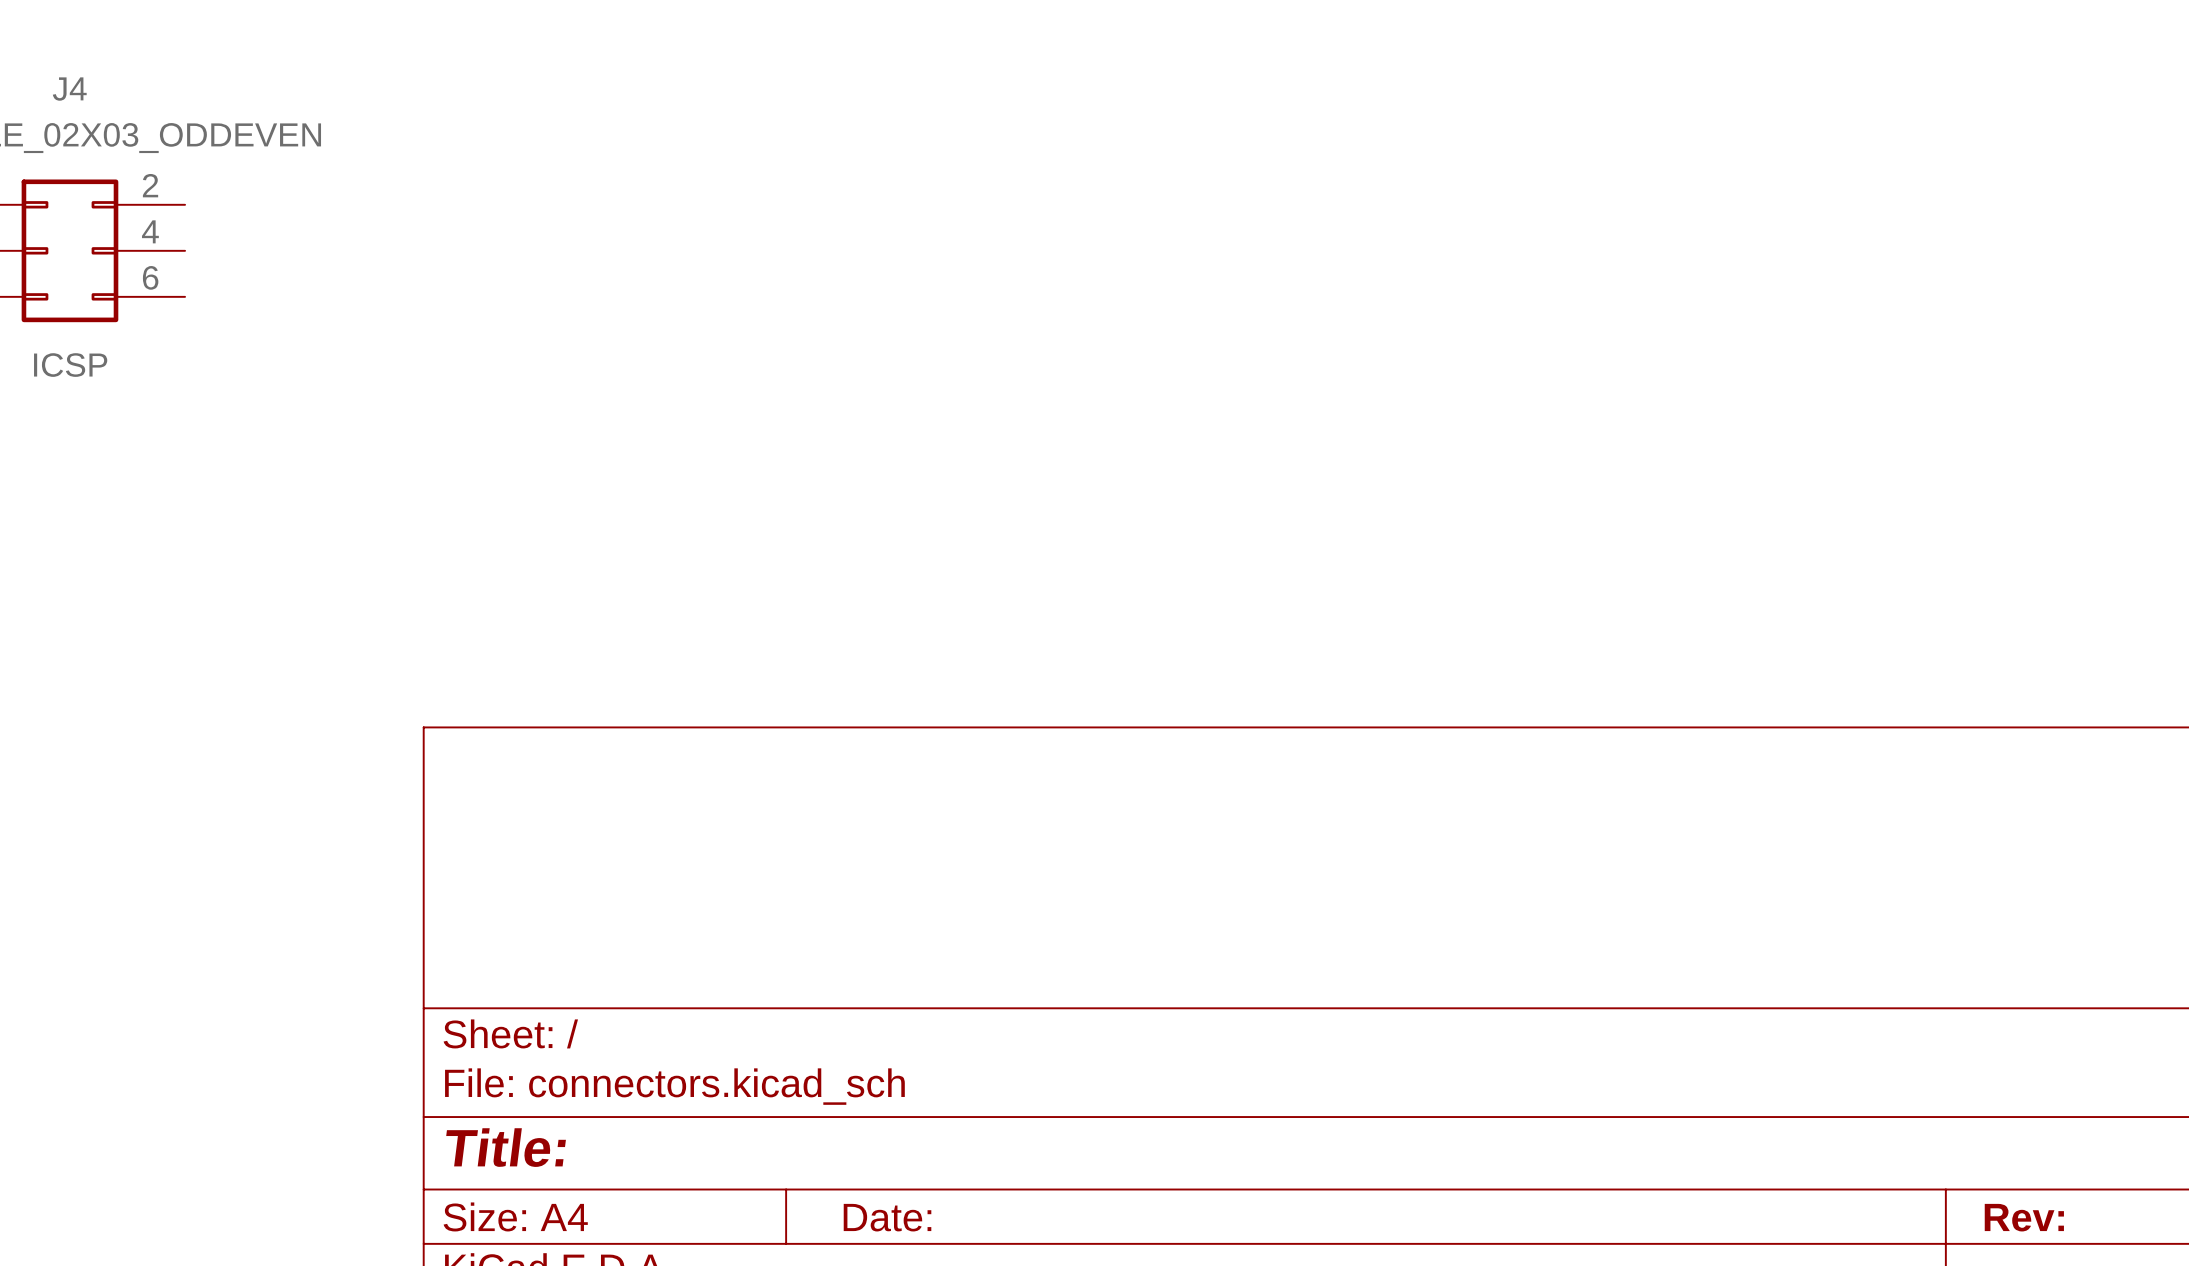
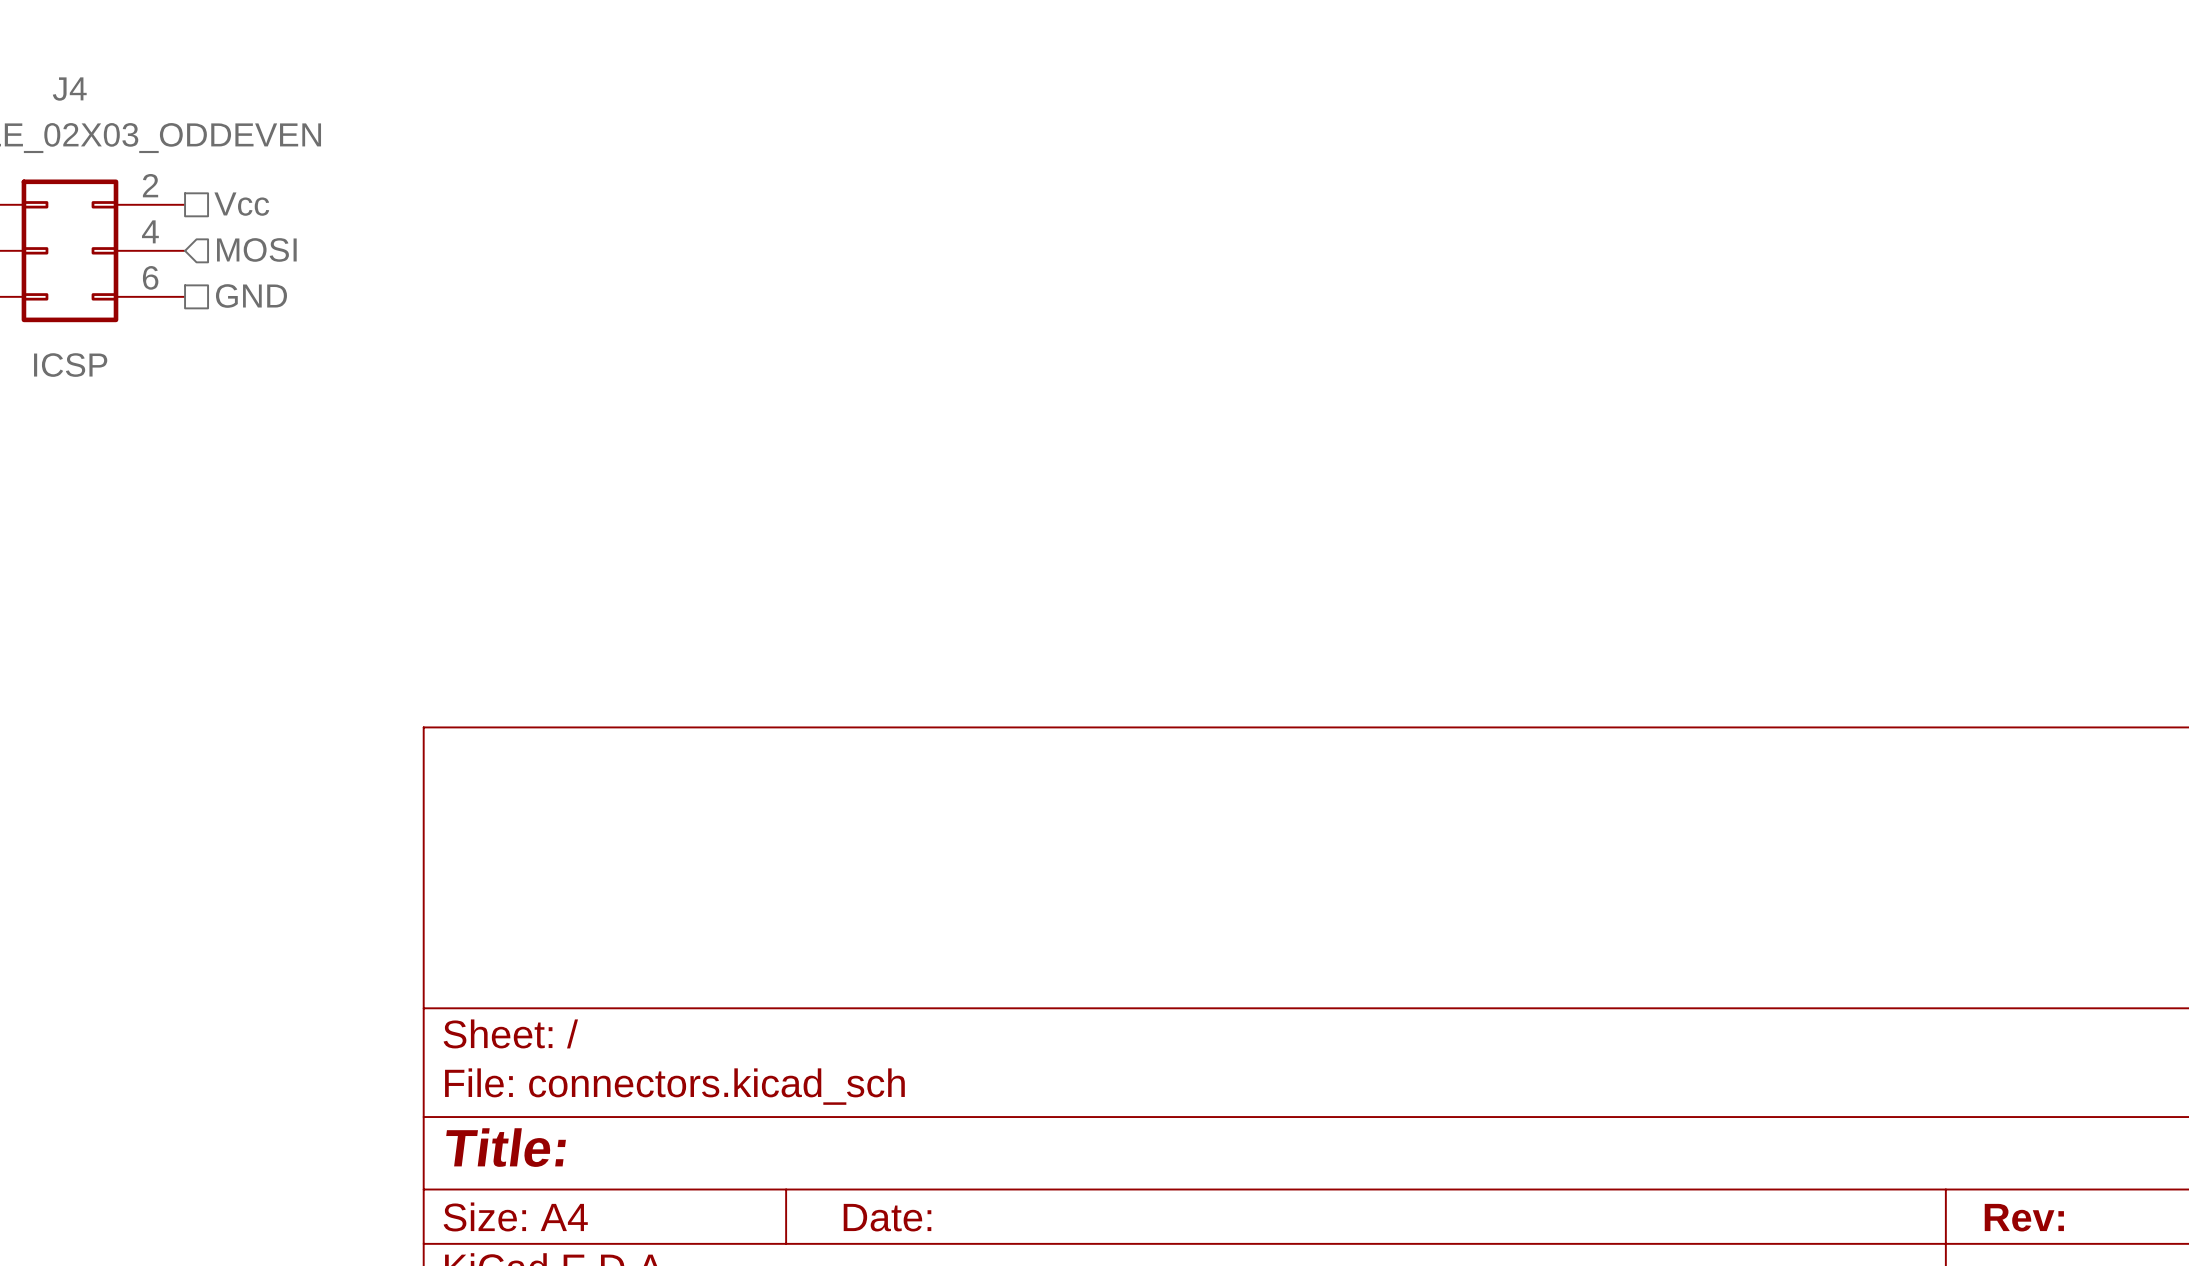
hierarchical label: none -> Vcc (241, 204)
hierarchical label: none -> MOSI (256, 249)
hierarchical label: none -> GND (251, 295)

